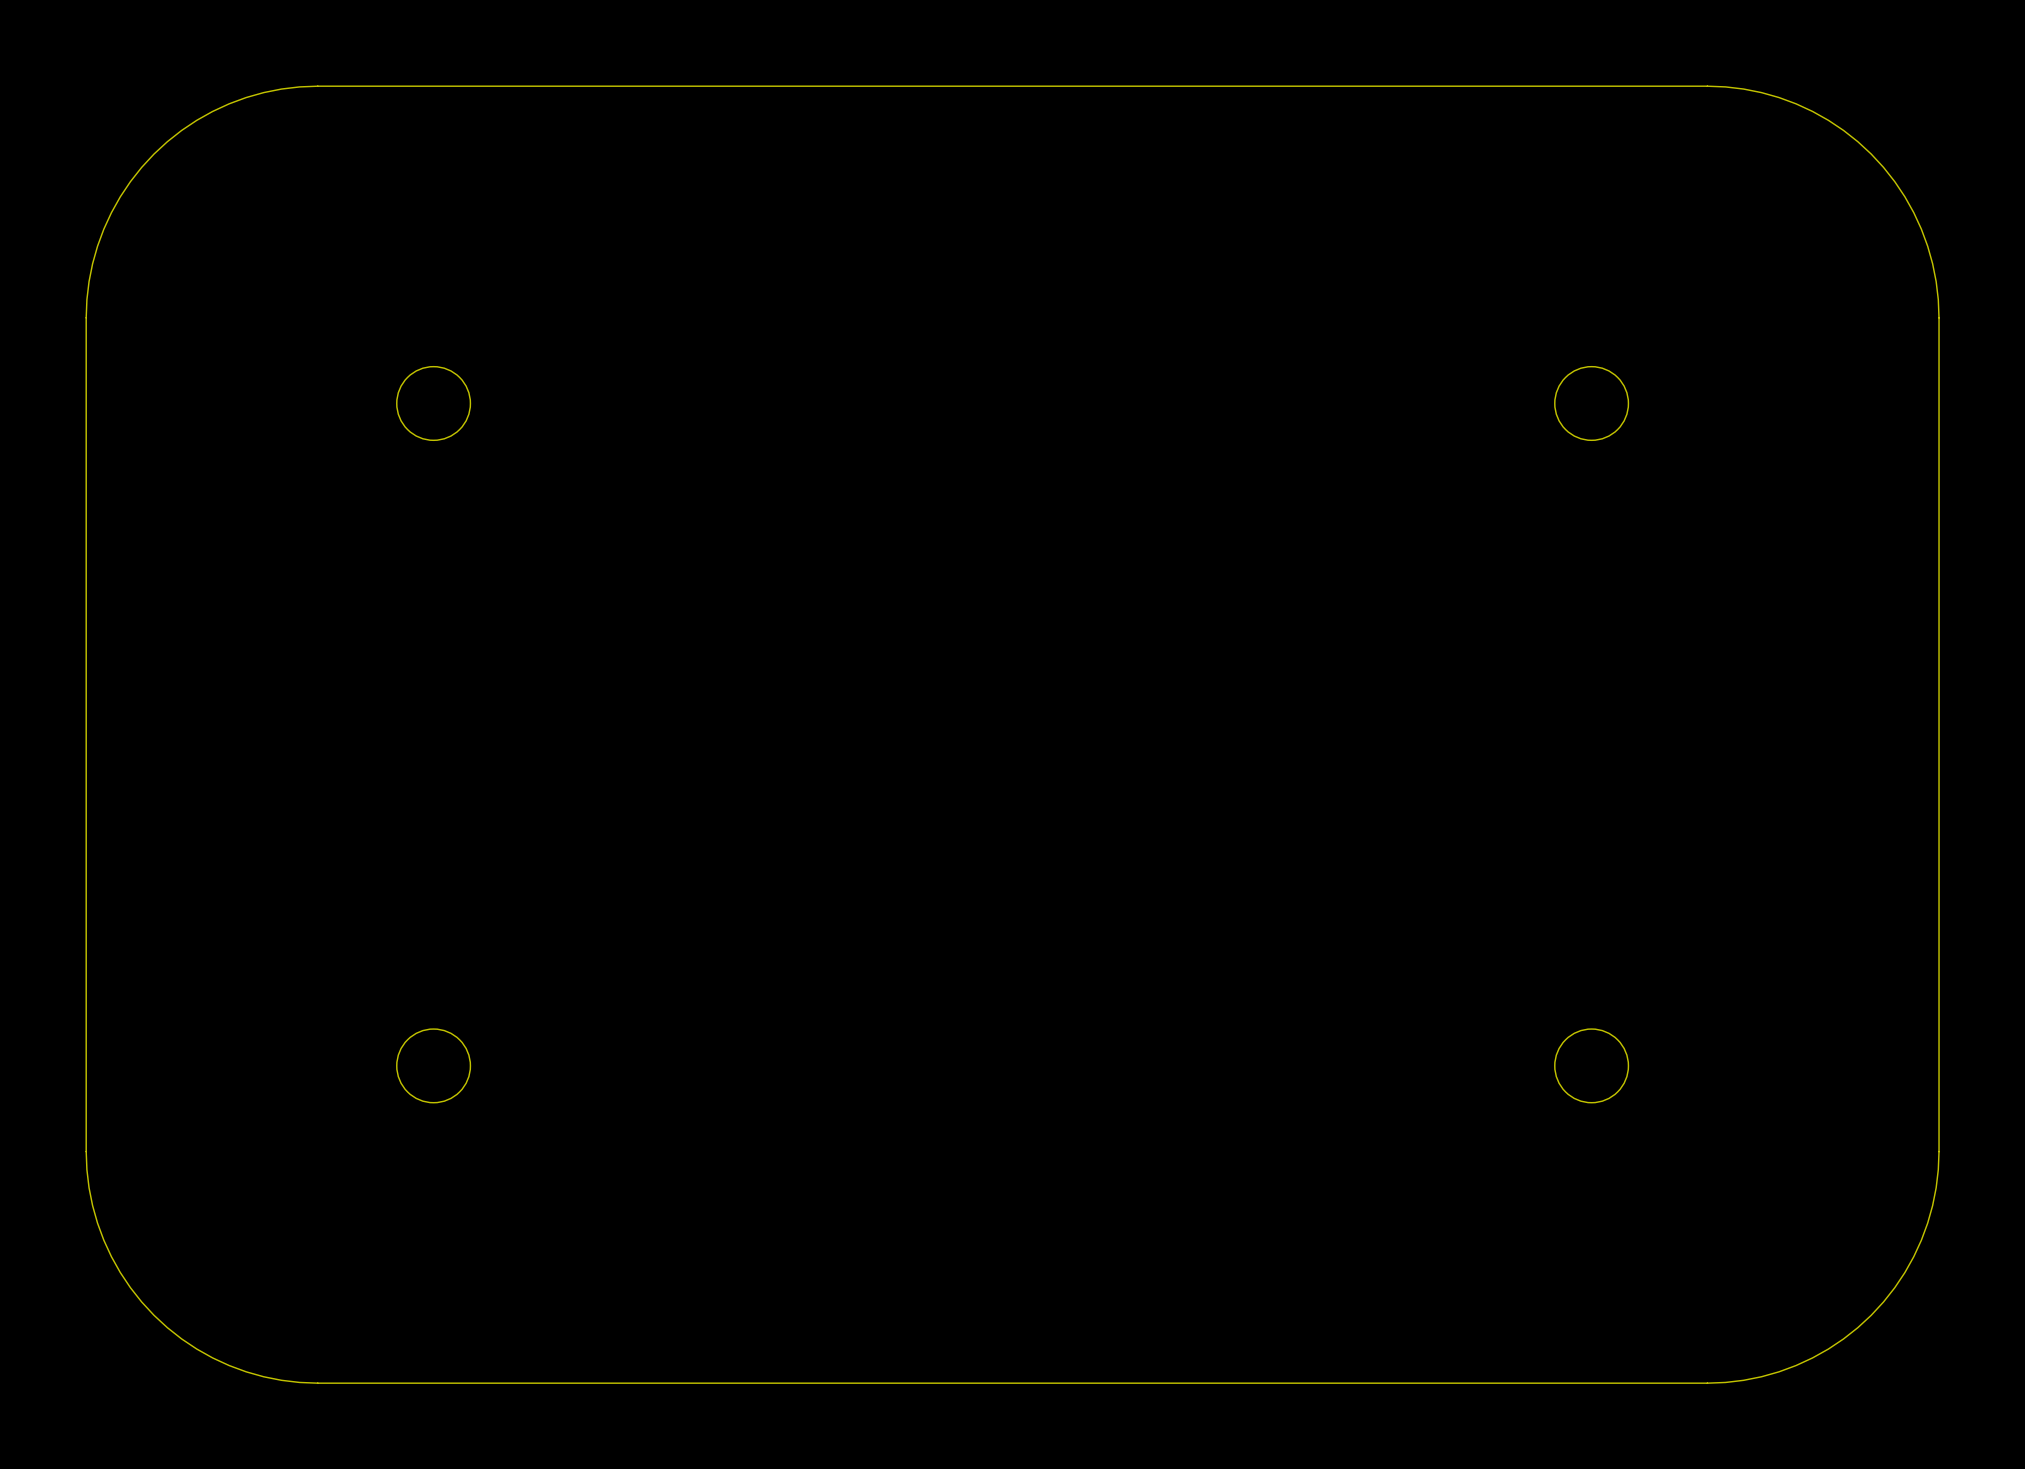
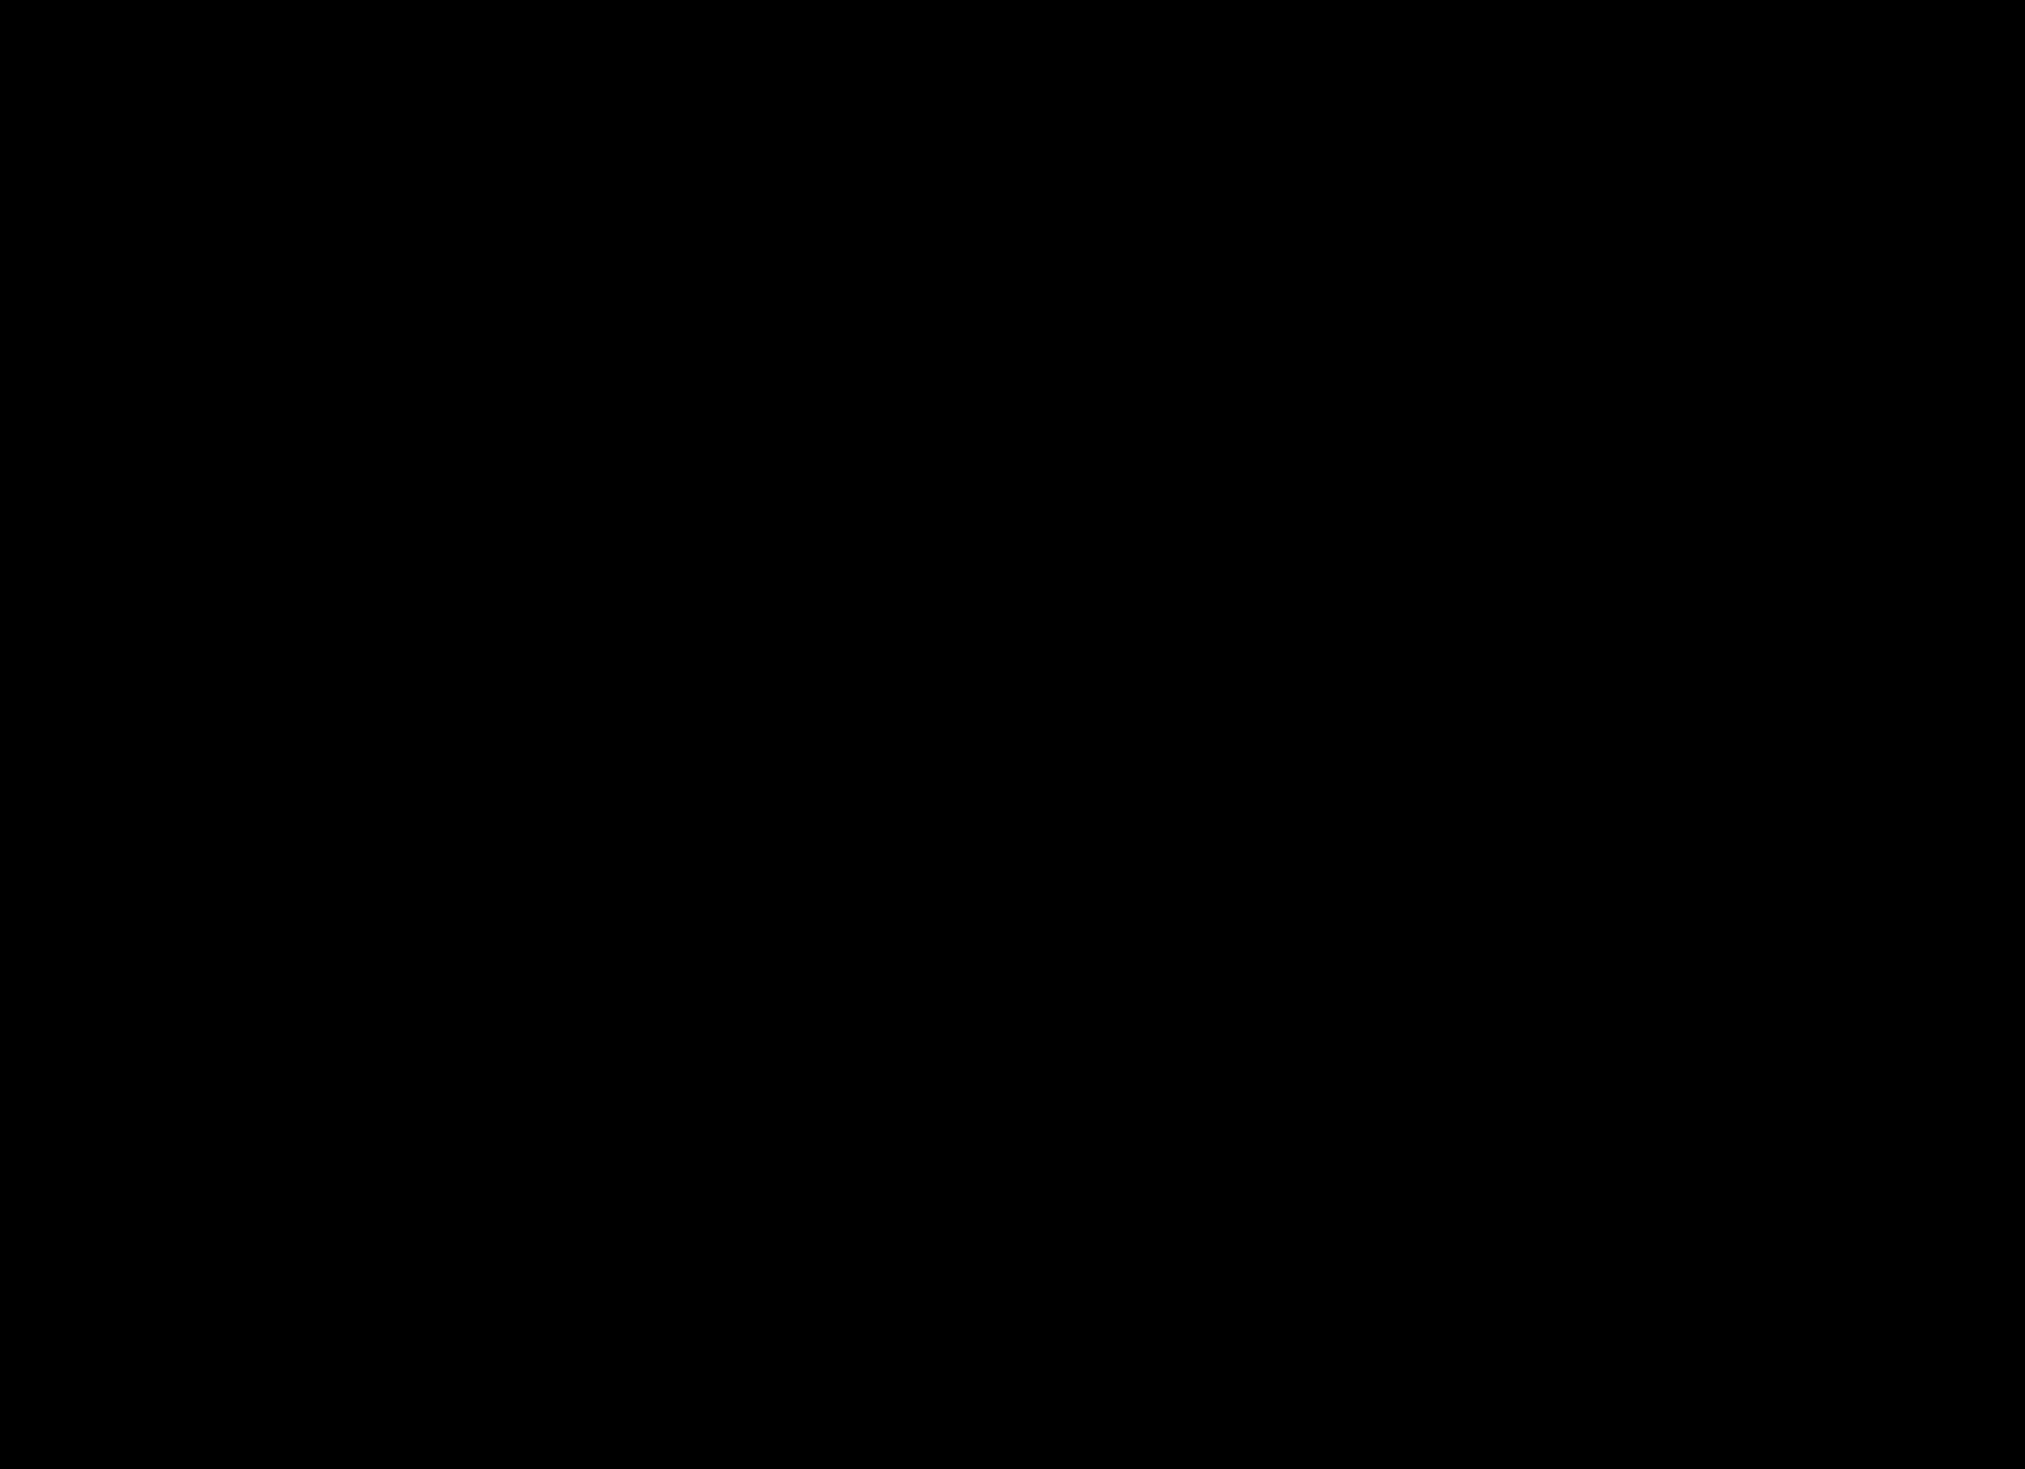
board edge: (317, 86) (1707, 86) (1743, 89) (1778, 97) (1812, 111) (1843, 130) (1883, 167) (1904, 196) (1927, 246) (1938, 299) (1938, 1169) (1927, 1223) (1913, 1256) (1894, 1287) (1857, 1327) (1812, 1357) (1761, 1376) (1707, 1383) (317, 1383) (281, 1380) (246, 1371) (212, 1357) (181, 1338) (141, 1301) (111, 1256) (92, 1205) (86, 1169) (86, 299) (92, 263) (111, 212) (141, 167) (167, 141) (196, 120) (246, 97) (281, 89) (317, 86) -> none
round board edge: [396, 366, 472, 441] -> none
round board edge: [1554, 366, 1630, 441] -> none
round board edge: [396, 1028, 472, 1104] -> none
round board edge: [1554, 1028, 1630, 1104] -> none

